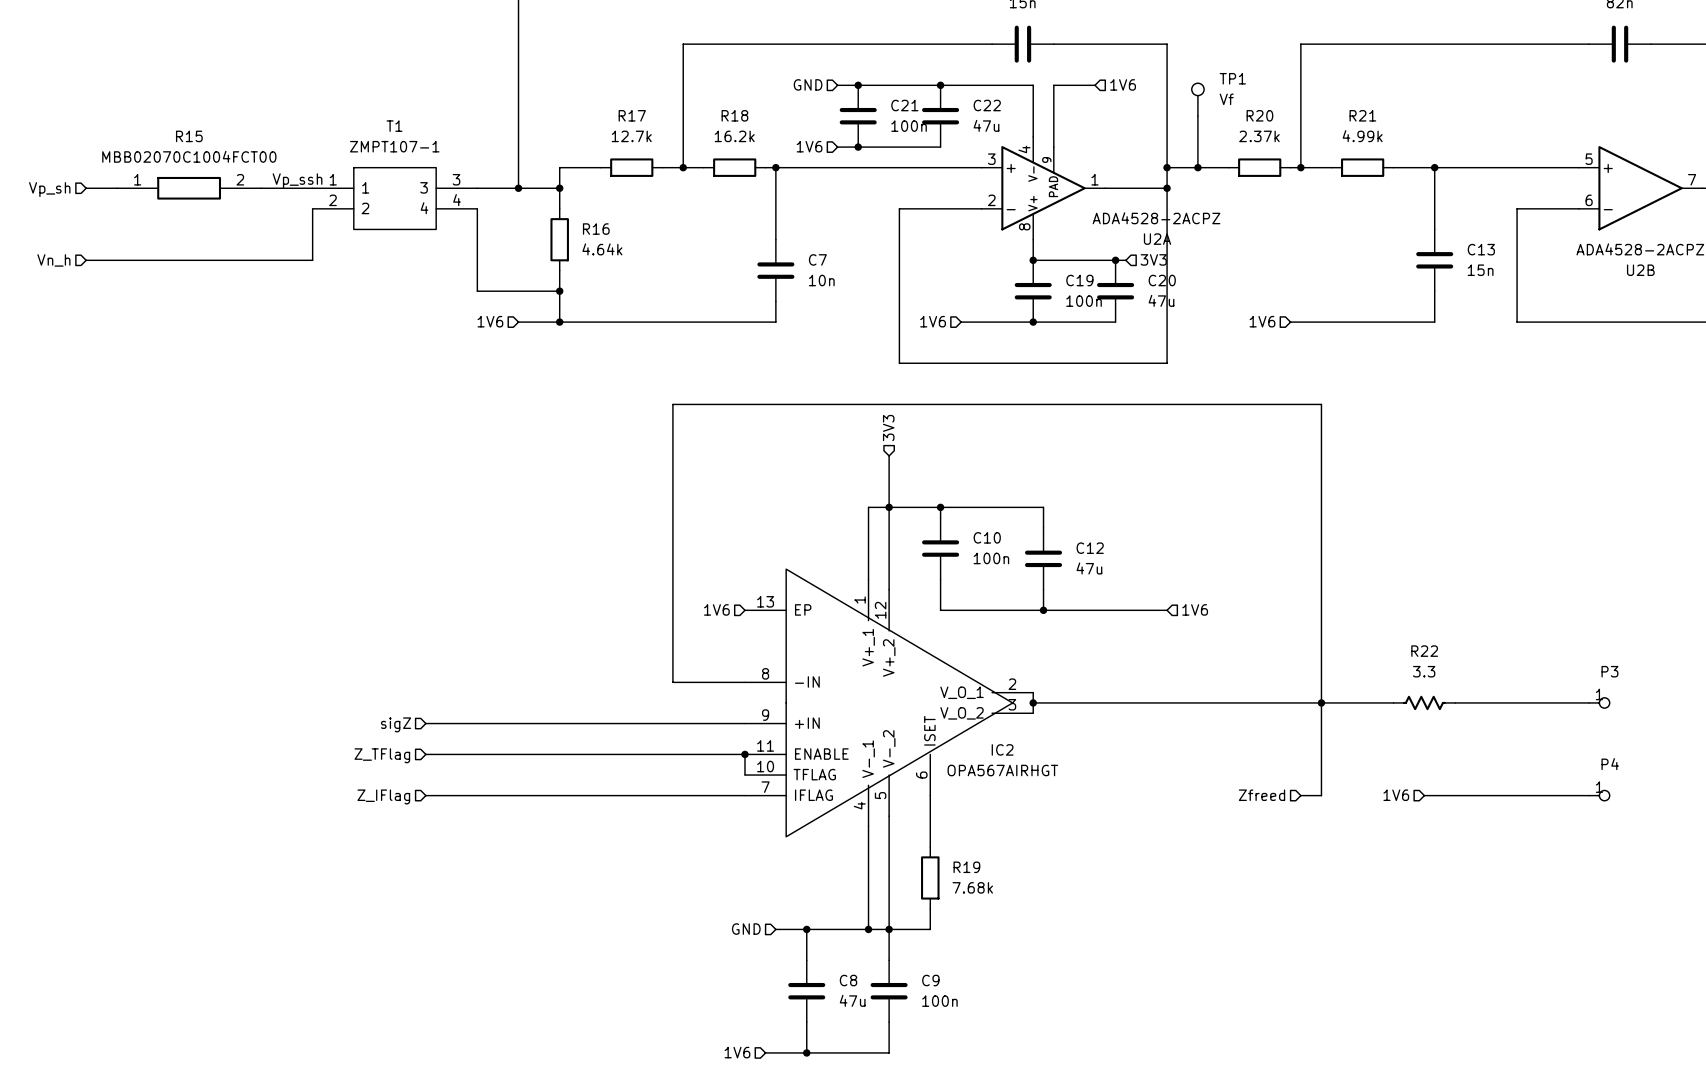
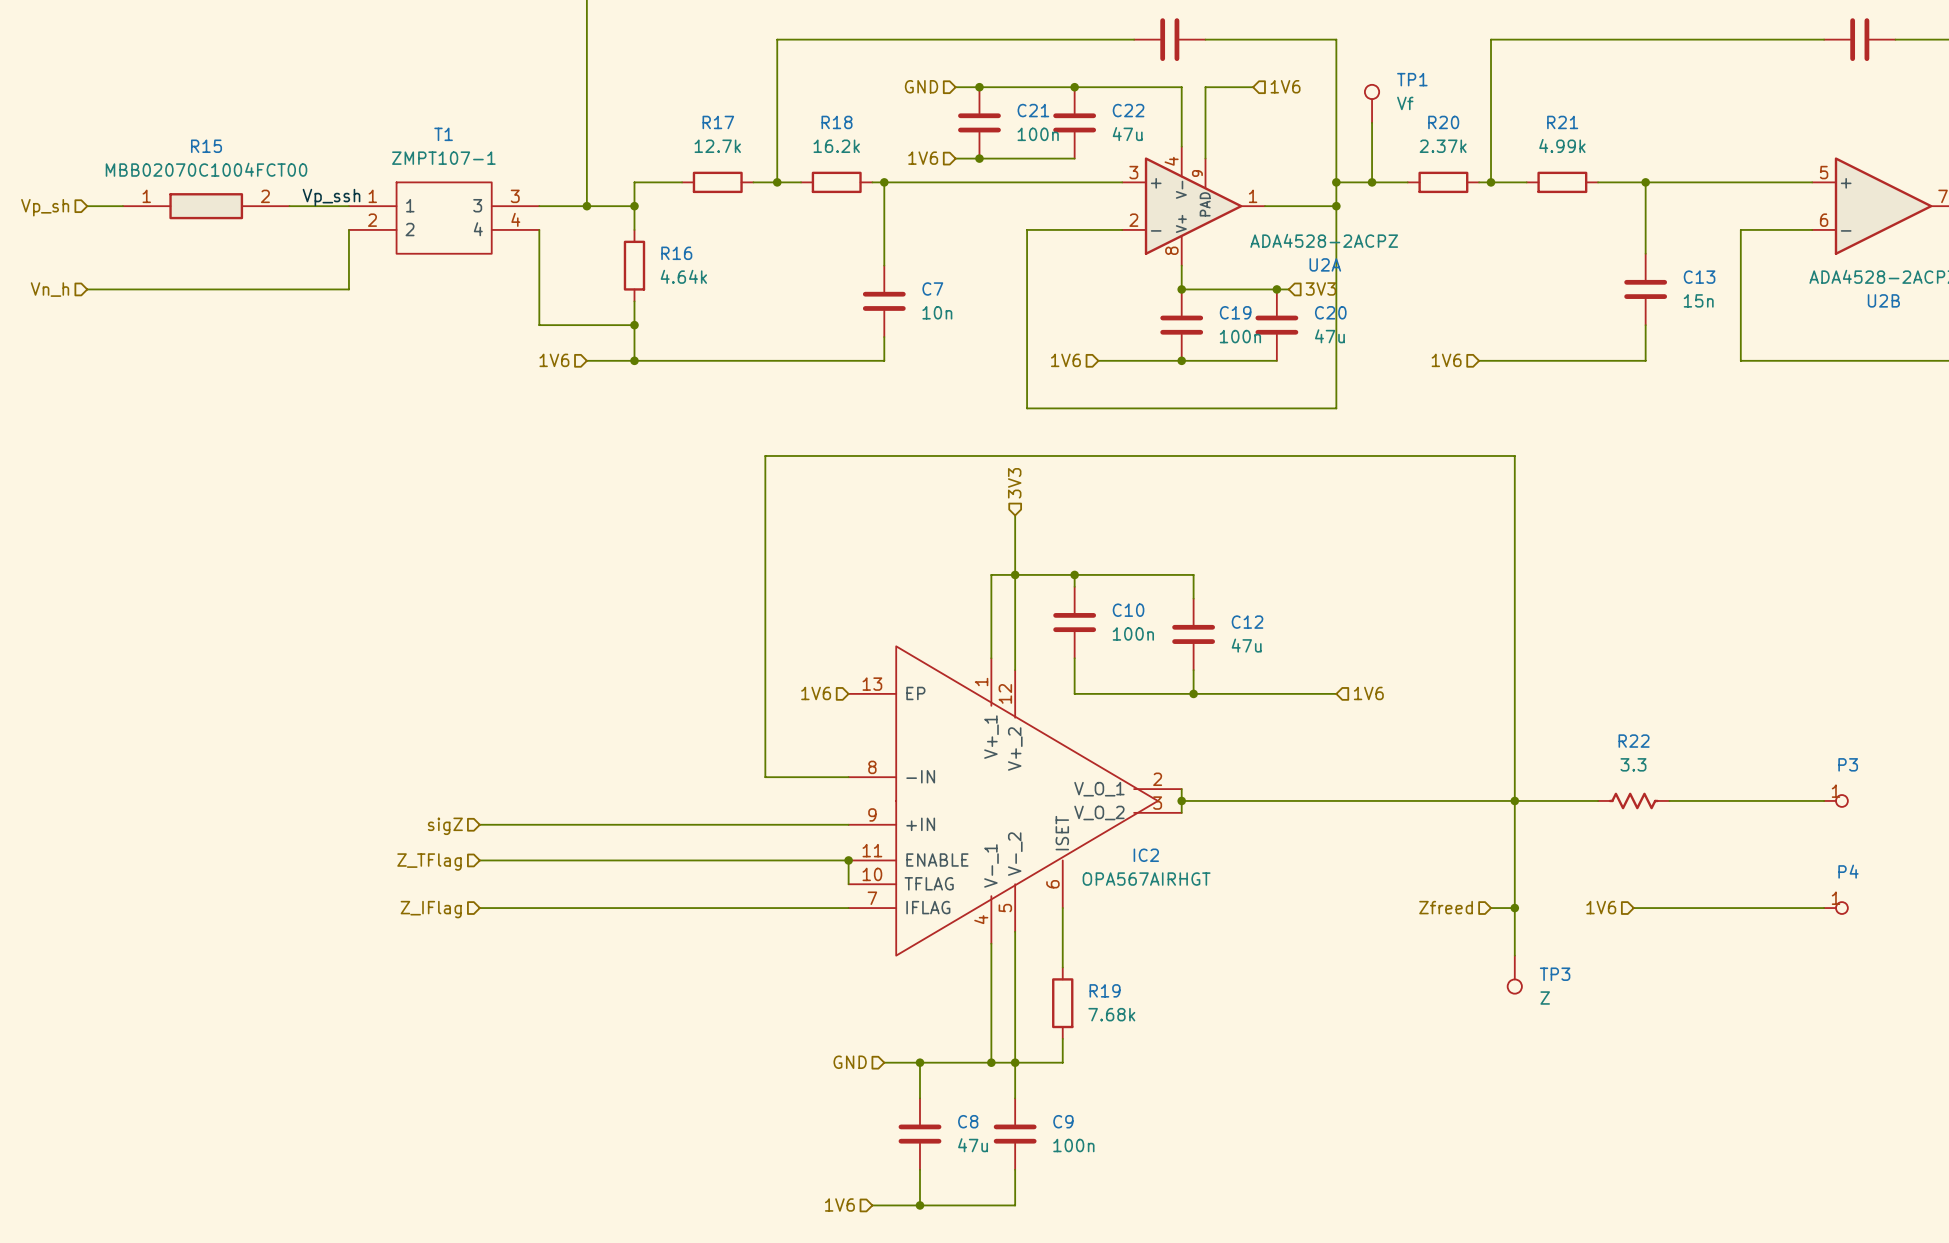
wire: none -> (1514, 908) (1514, 955)
junction: none -> (1514, 908)
TP3: none -> Z (1514, 974)

